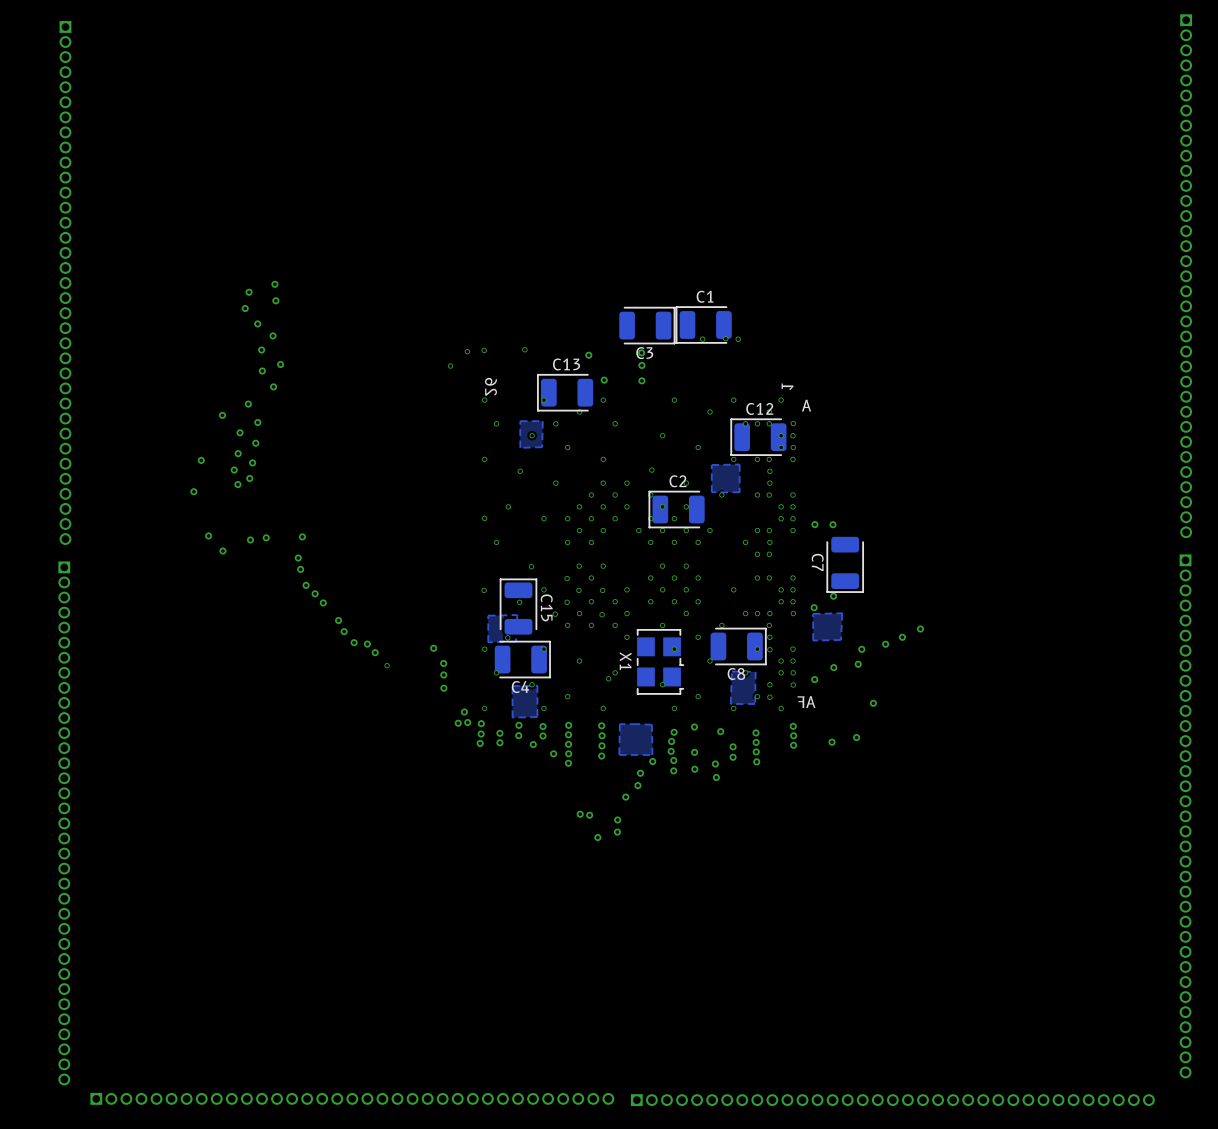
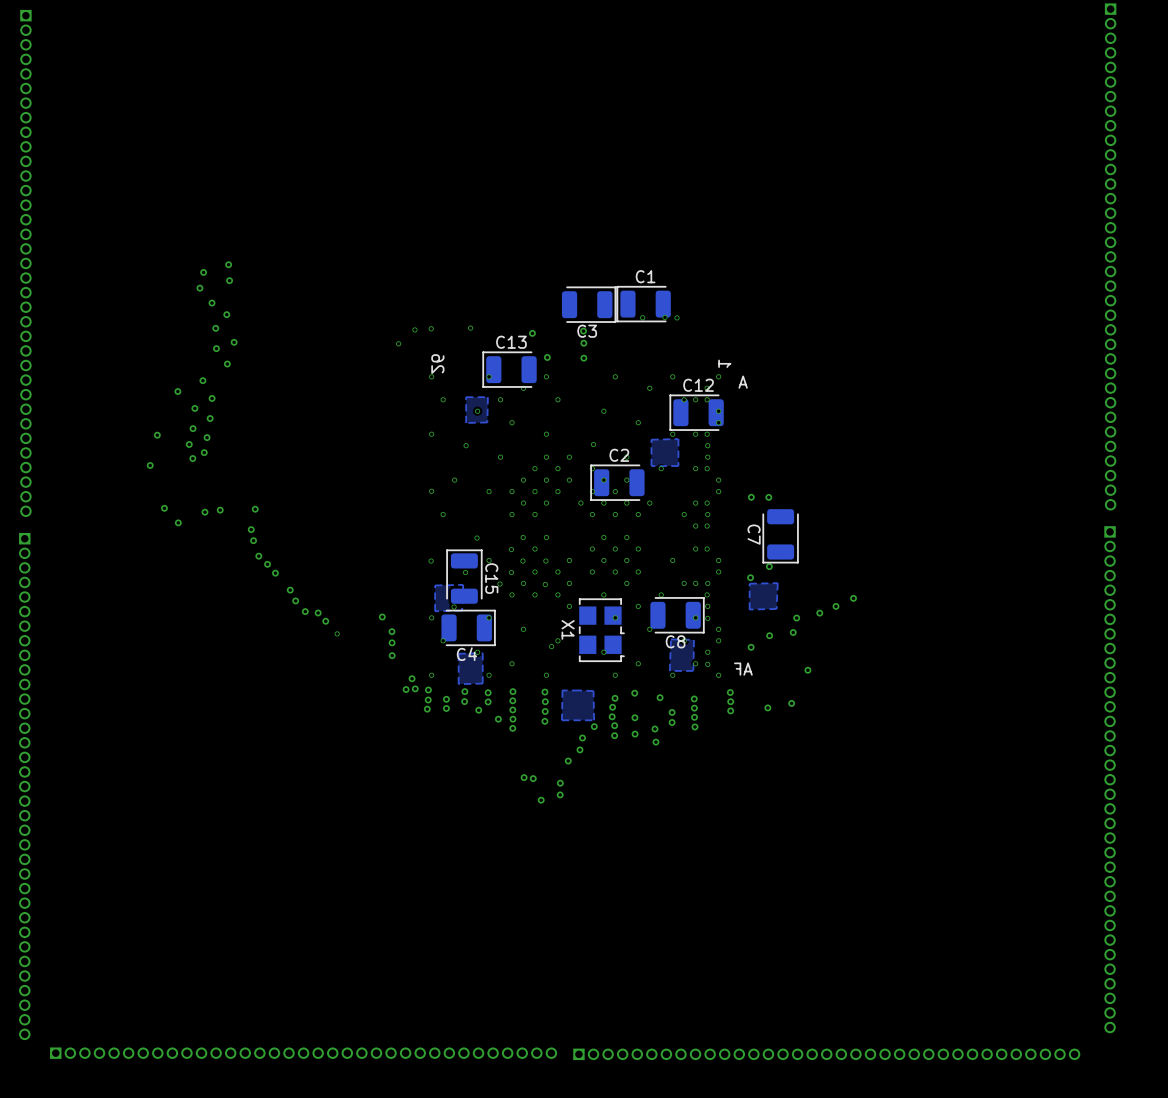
via: (793, 423) -> none
via: (793, 435) -> none
via: (793, 447) -> none
via: (793, 459) -> none
via: (793, 494) -> none
via: (793, 506) -> none
via: (793, 518) -> none
via: (793, 530) -> none
via: (793, 578) -> none
via: (793, 589) -> none
via: (793, 601) -> none
via: (793, 613) -> none
via: (793, 649) -> none
via: (793, 661) -> none
via: (793, 672) -> none
via: (793, 685) -> none

